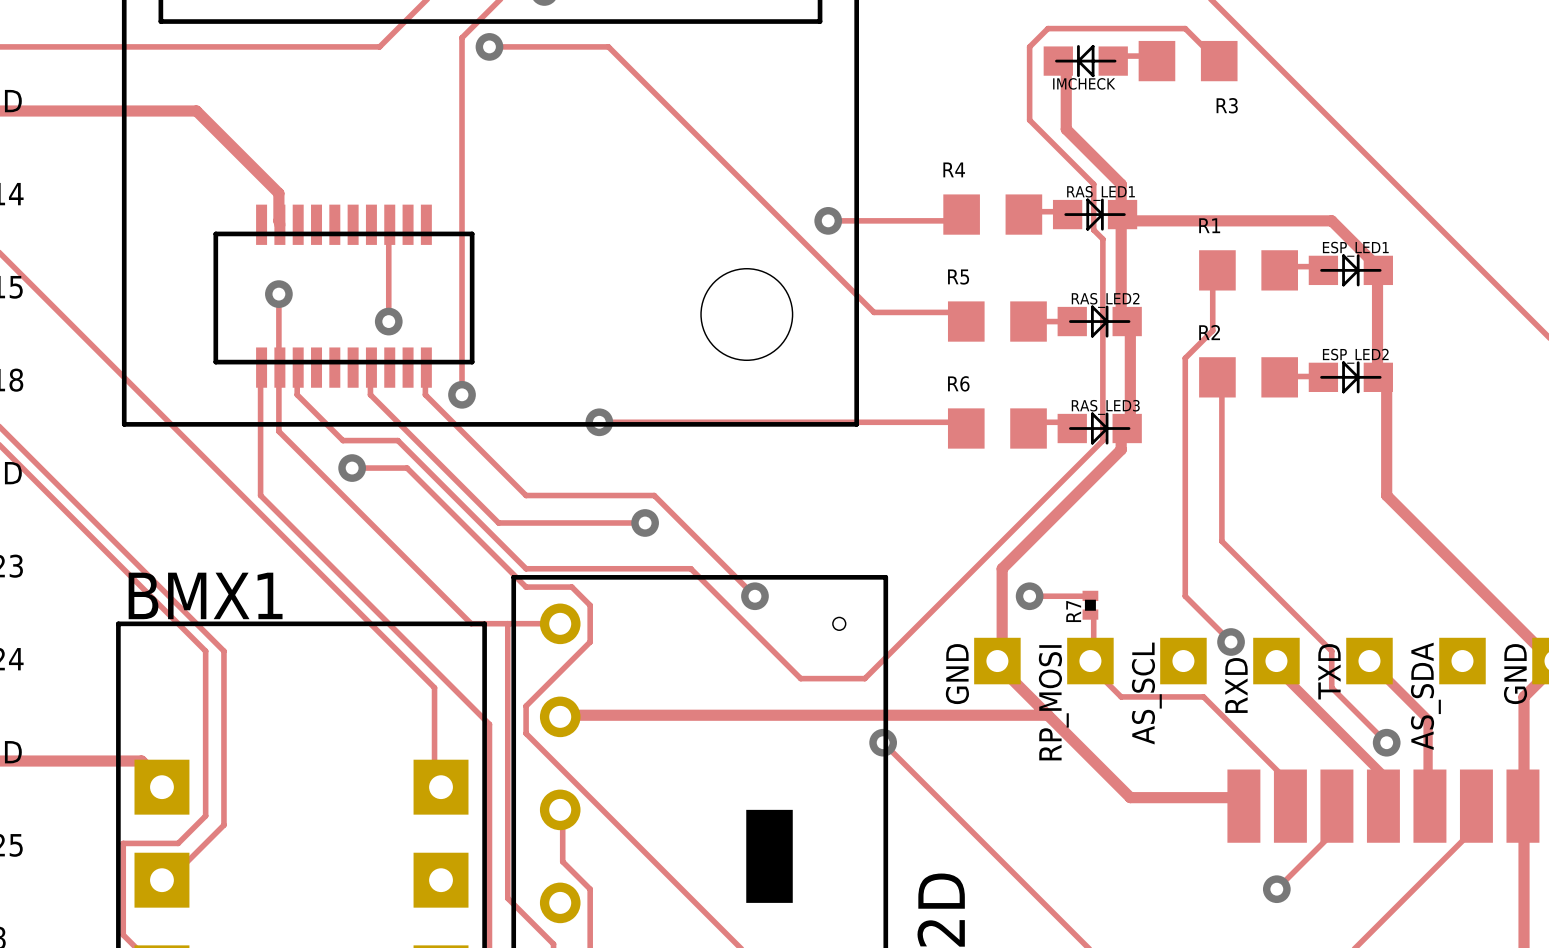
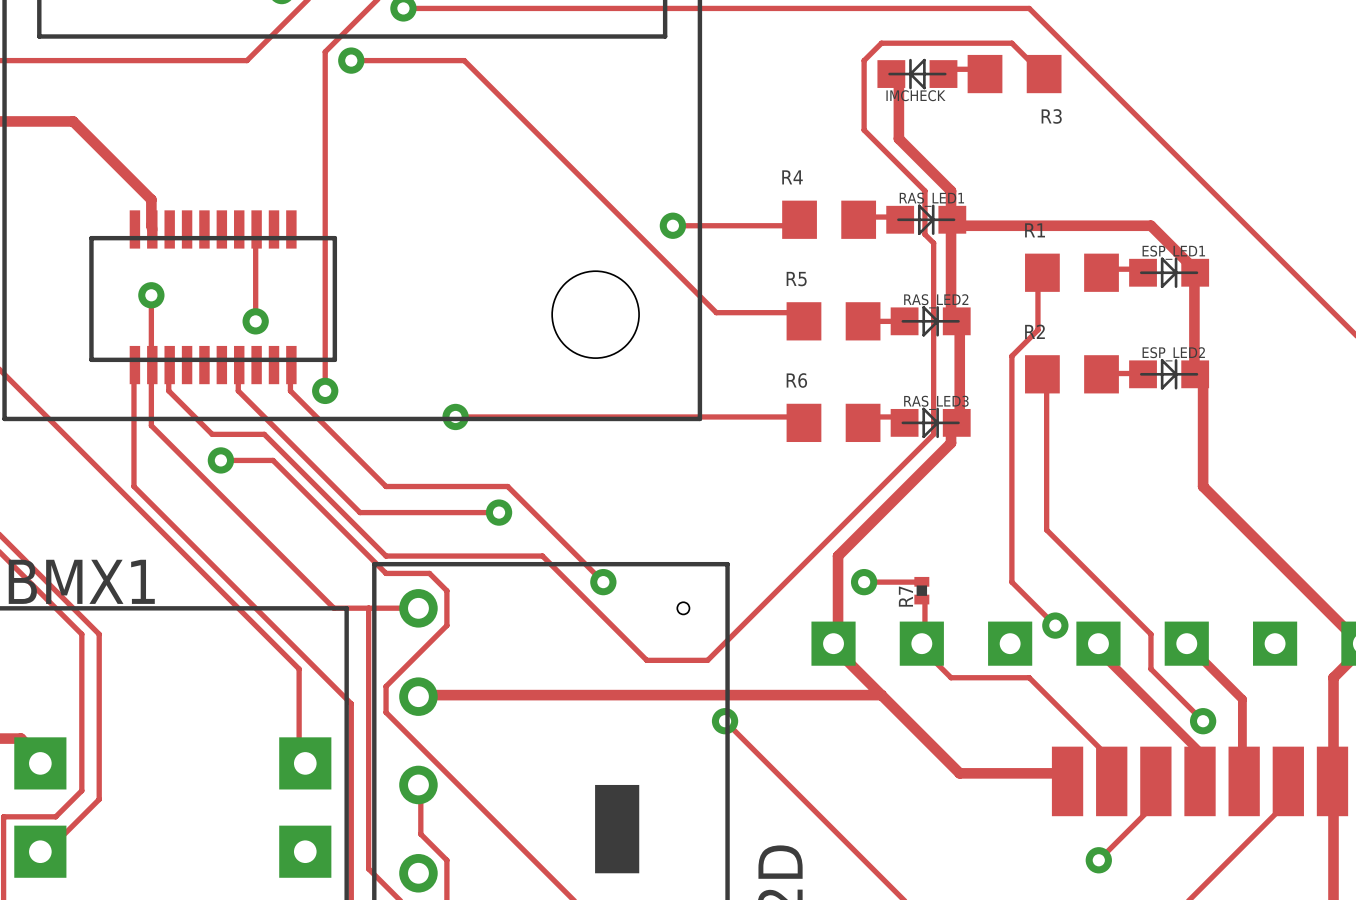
text: TXD (1329, 671) -> none
text: GND (957, 674) -> none
text: GND (1515, 674) -> none
text: RXD (1236, 685) -> none
text: AS_SCL (1146, 693) -> none
text: AS_SDA (1425, 696) -> none
text: RP_MOSI (1053, 702) -> none

